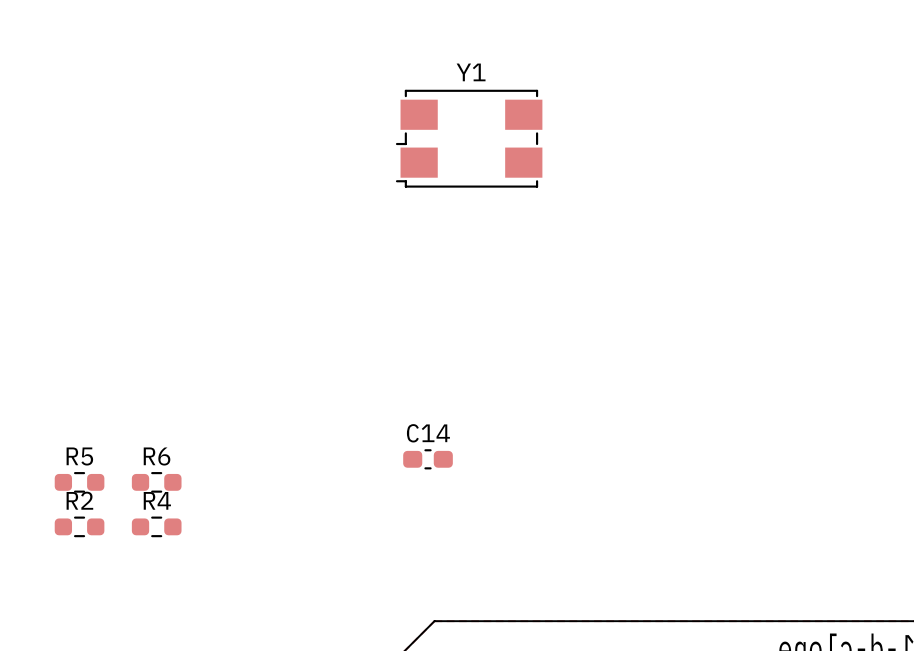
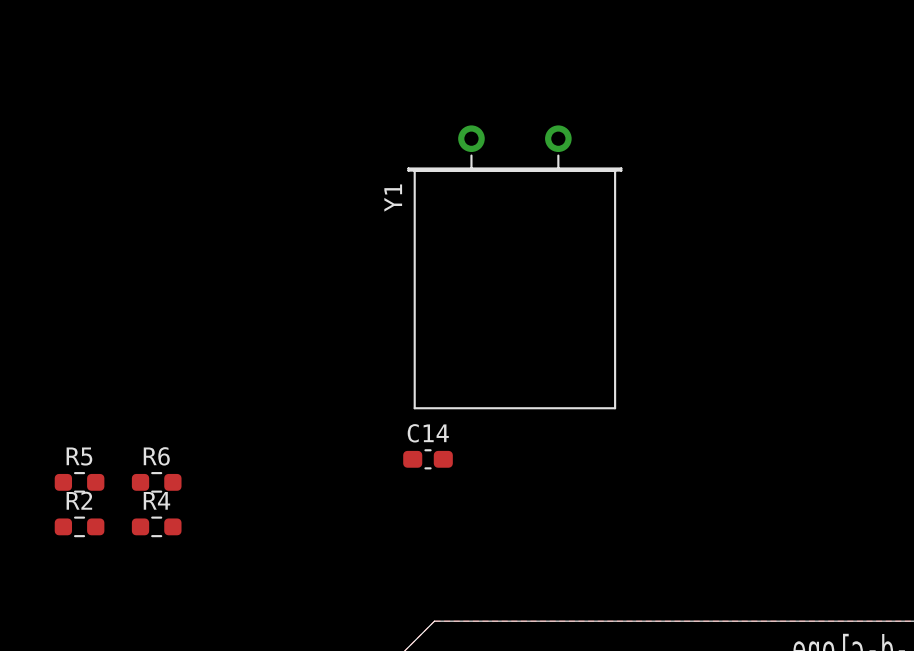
Y1 name position: Y1 (471, 72) -> Y1 (393, 198)
Y1 footprint: [395, 89, 543, 188] -> [407, 125, 623, 410]

